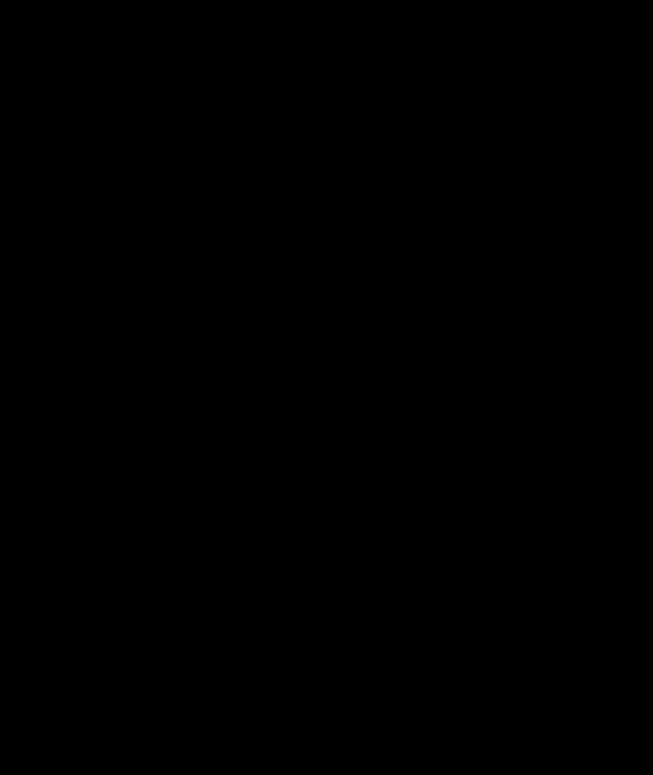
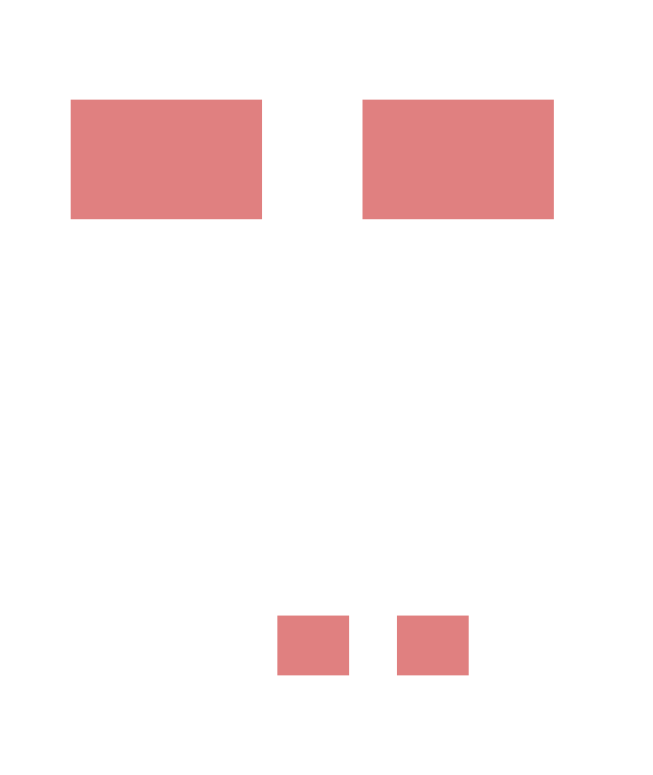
part: none -> (312, 159)
part: none -> (373, 645)

